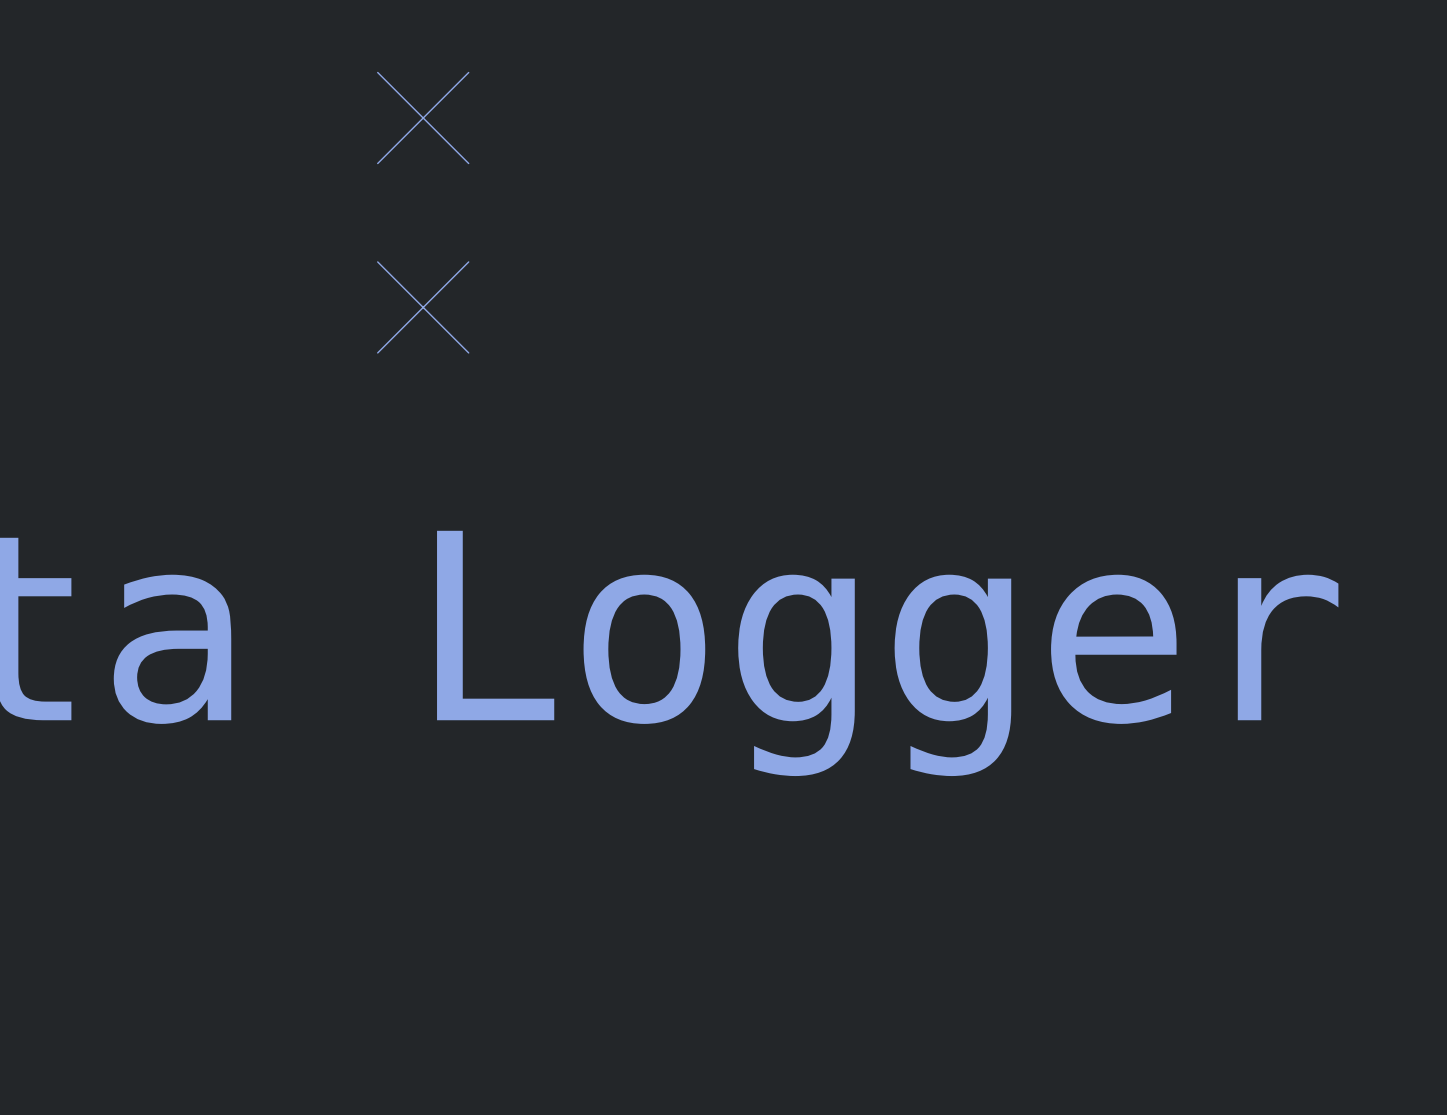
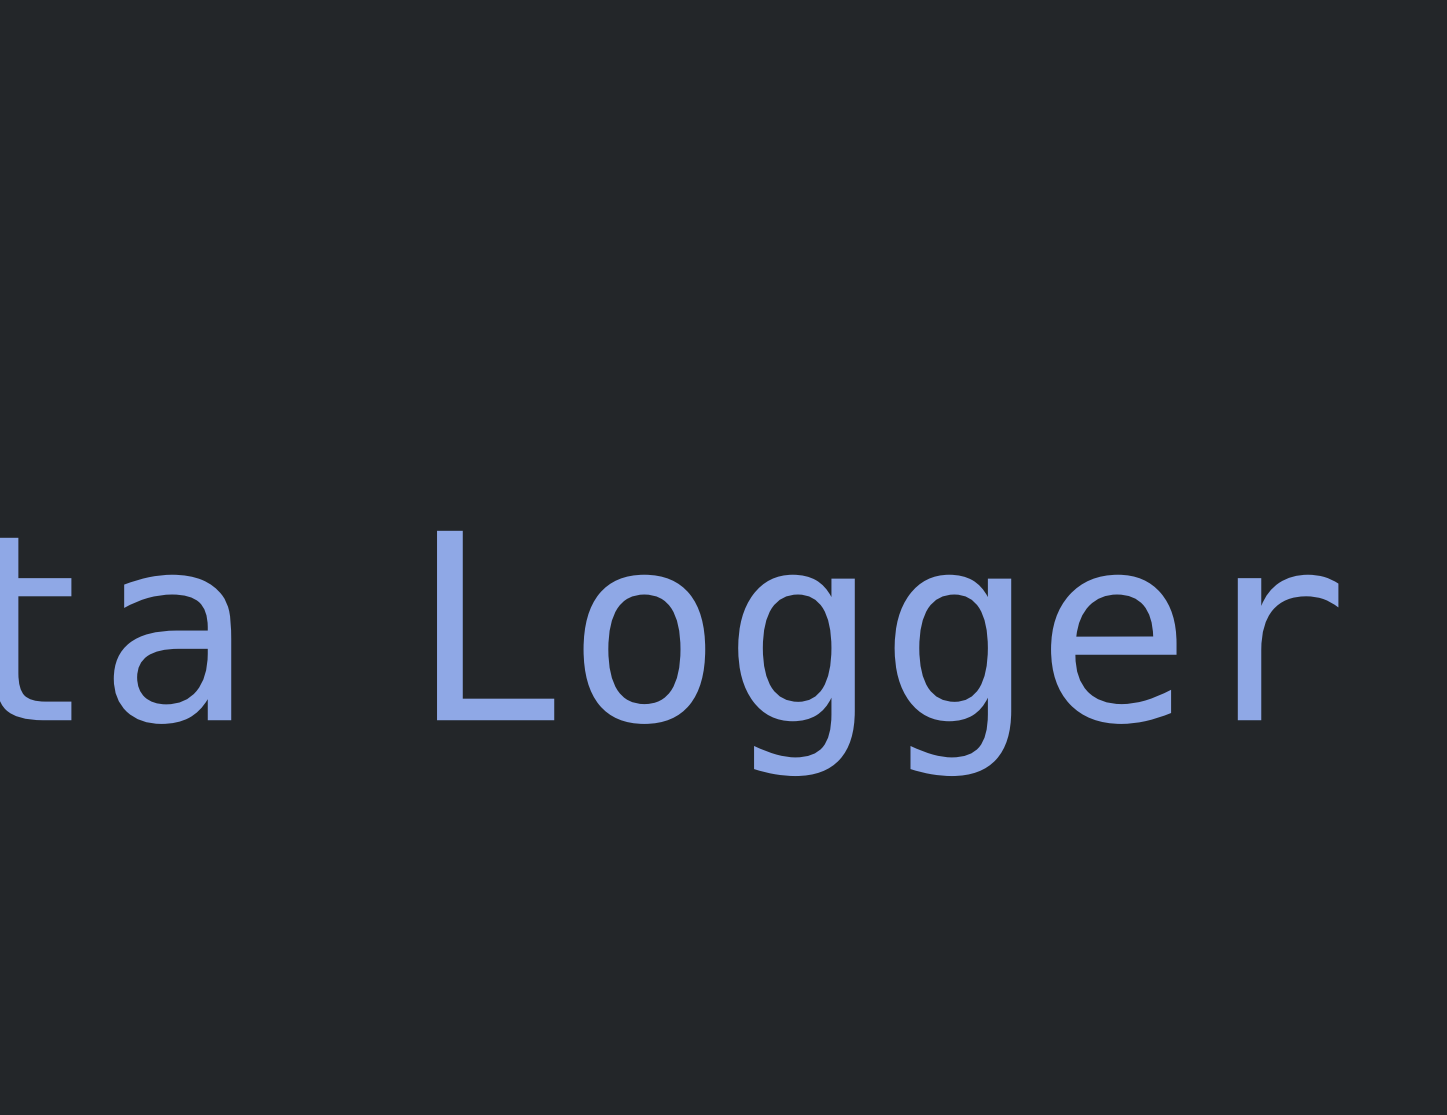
no-connect mark: (423, 118) -> none
no-connect mark: (423, 307) -> none

